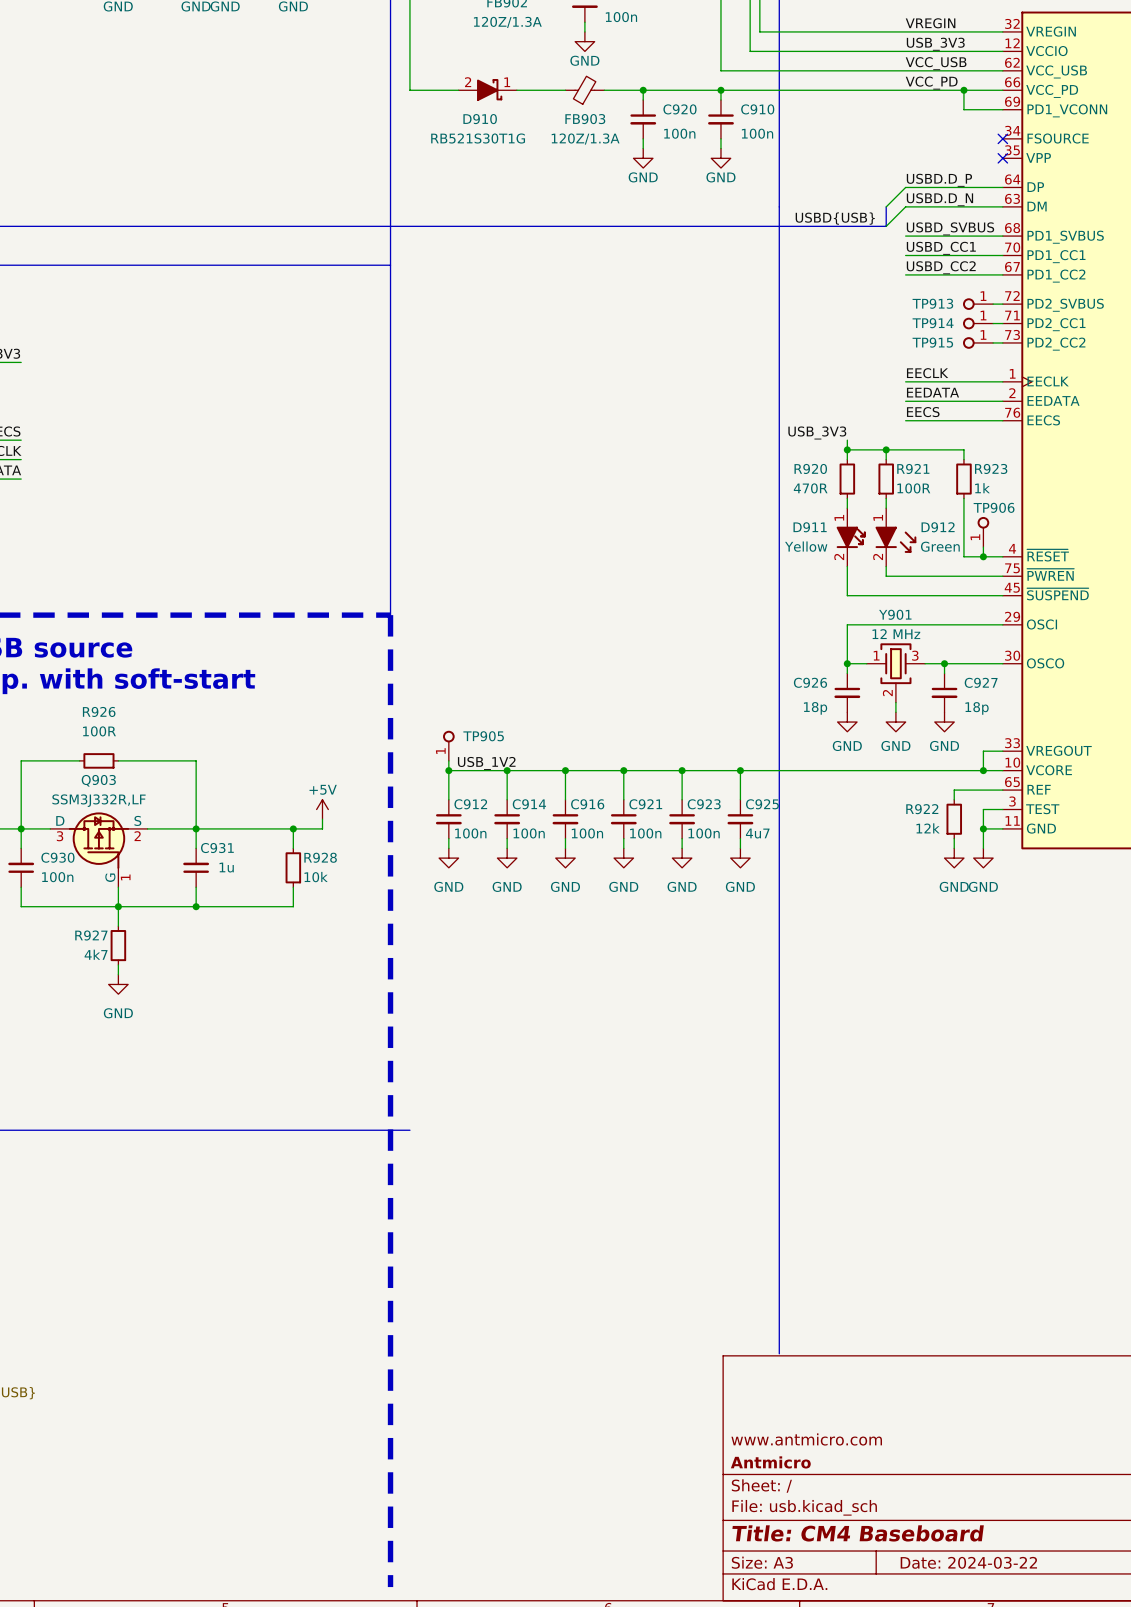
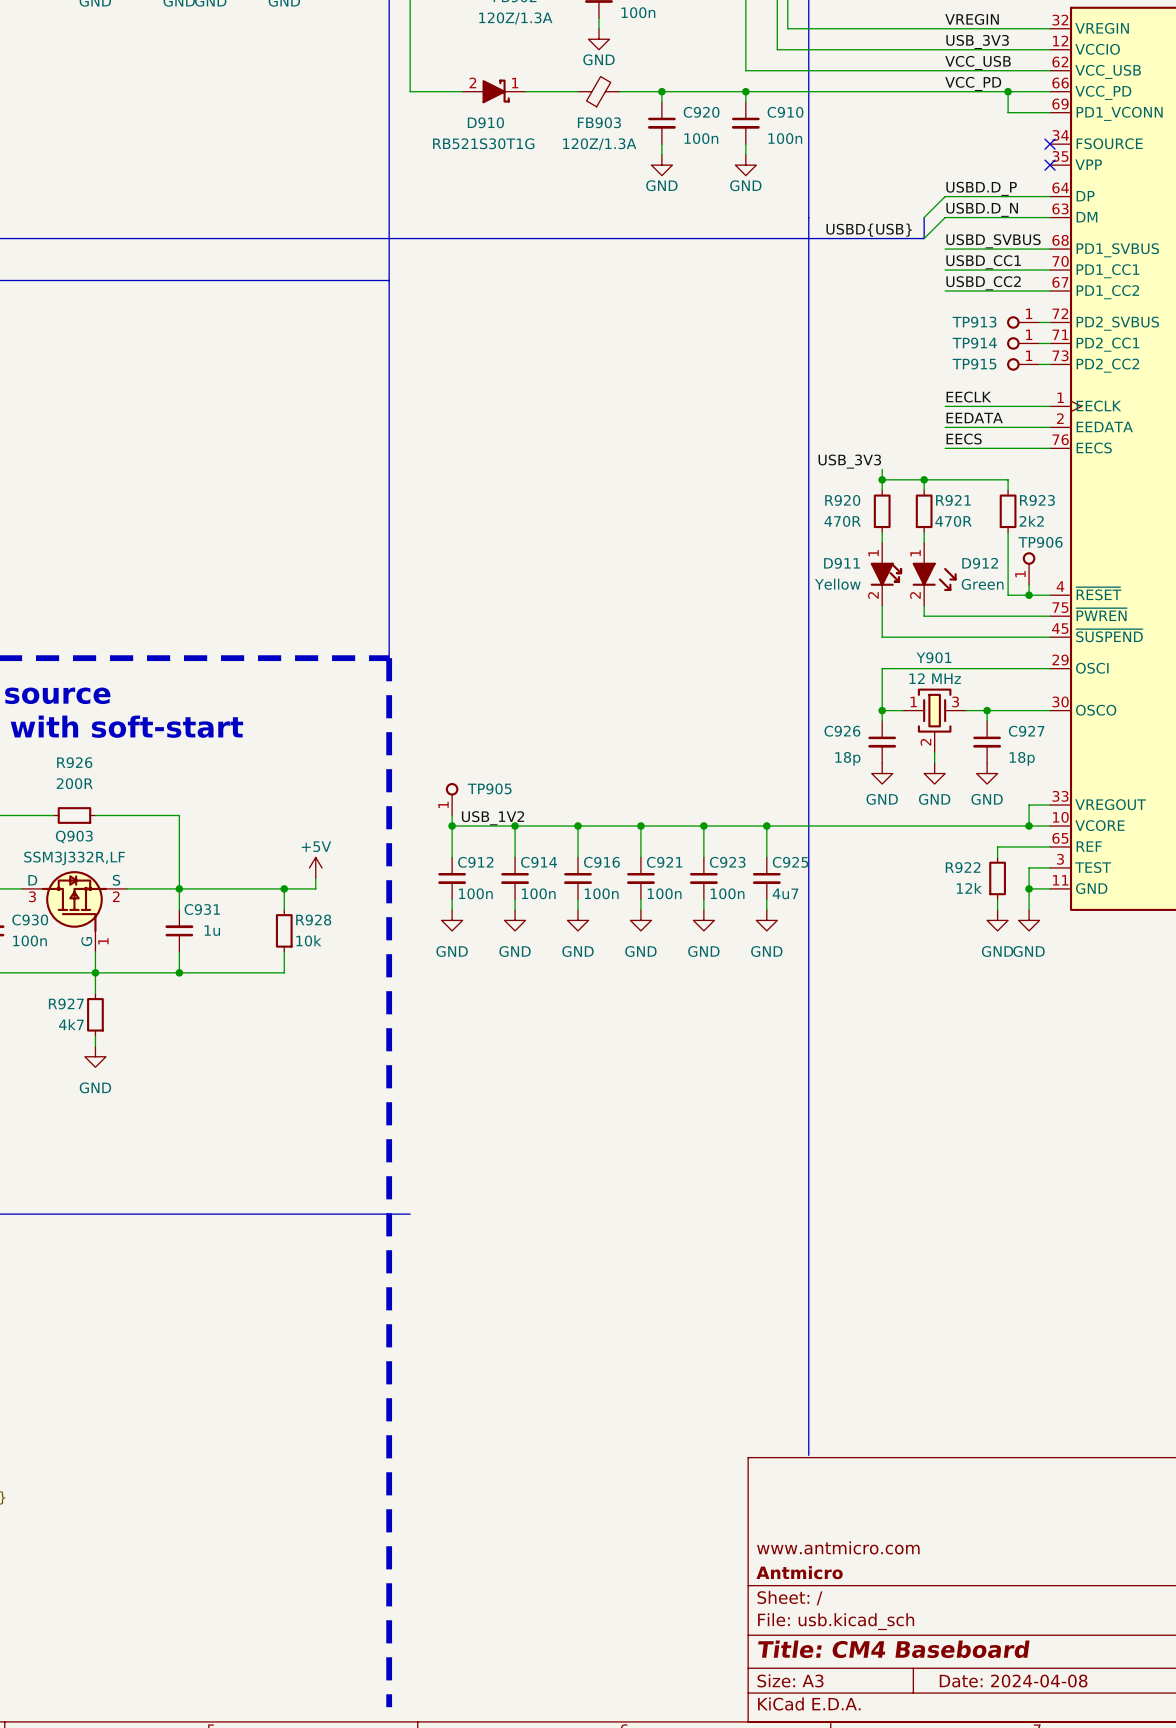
R921 text: 100R (913, 488) -> 470R (953, 521)
R923 text: 1k (982, 488) -> 2k2 (1031, 521)
R926 text: 100R (99, 731) -> 200R (74, 783)
title block: Date: 2024-03-22 (968, 1562) -> Date: 2024-04-08 (1013, 1681)

